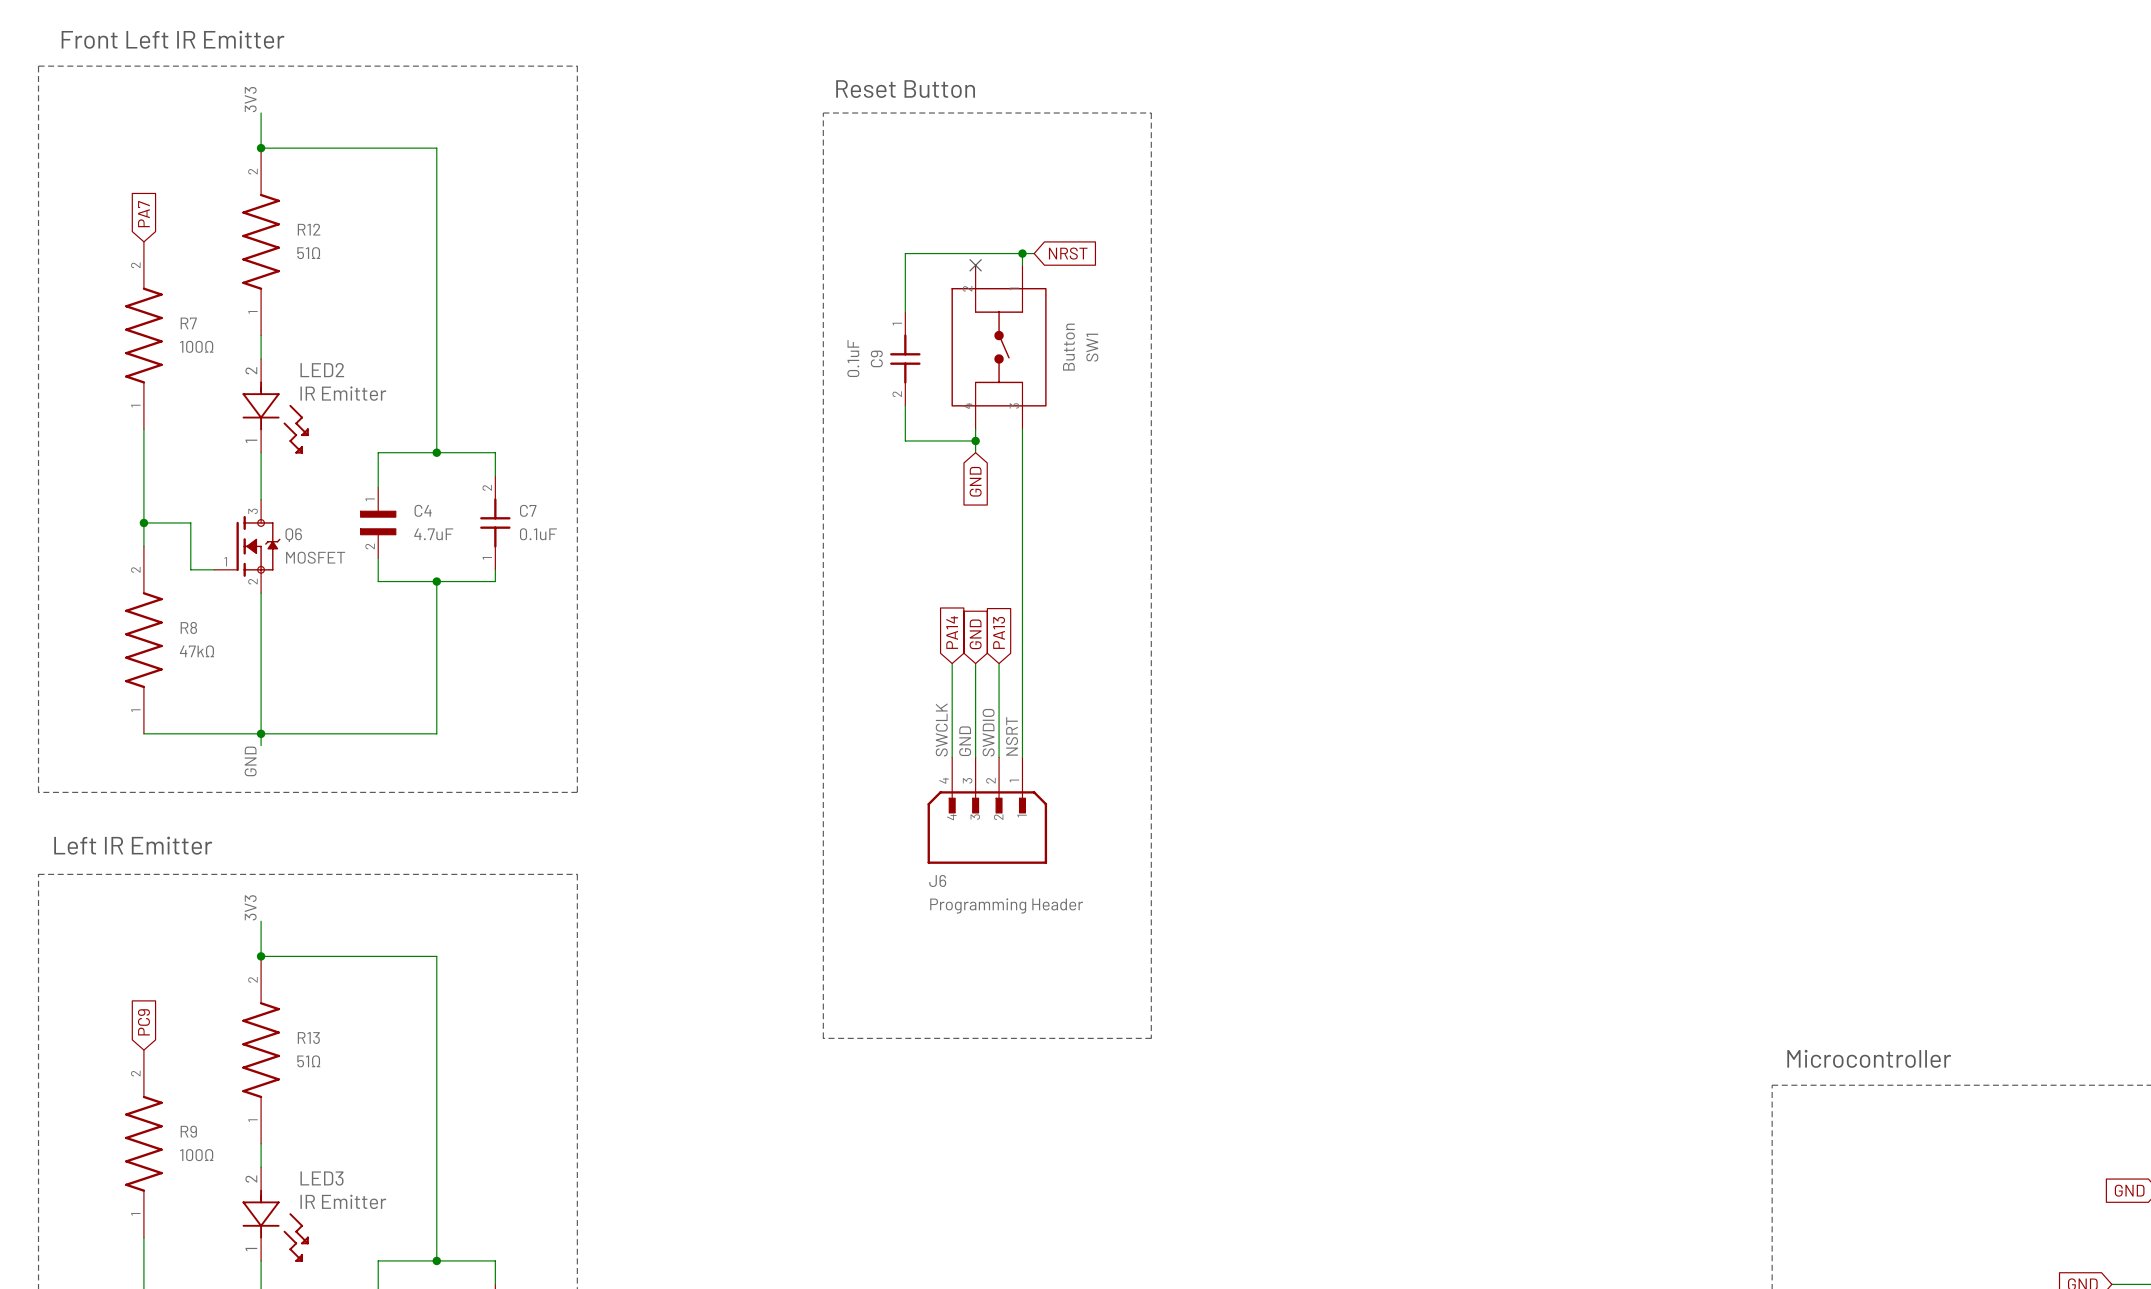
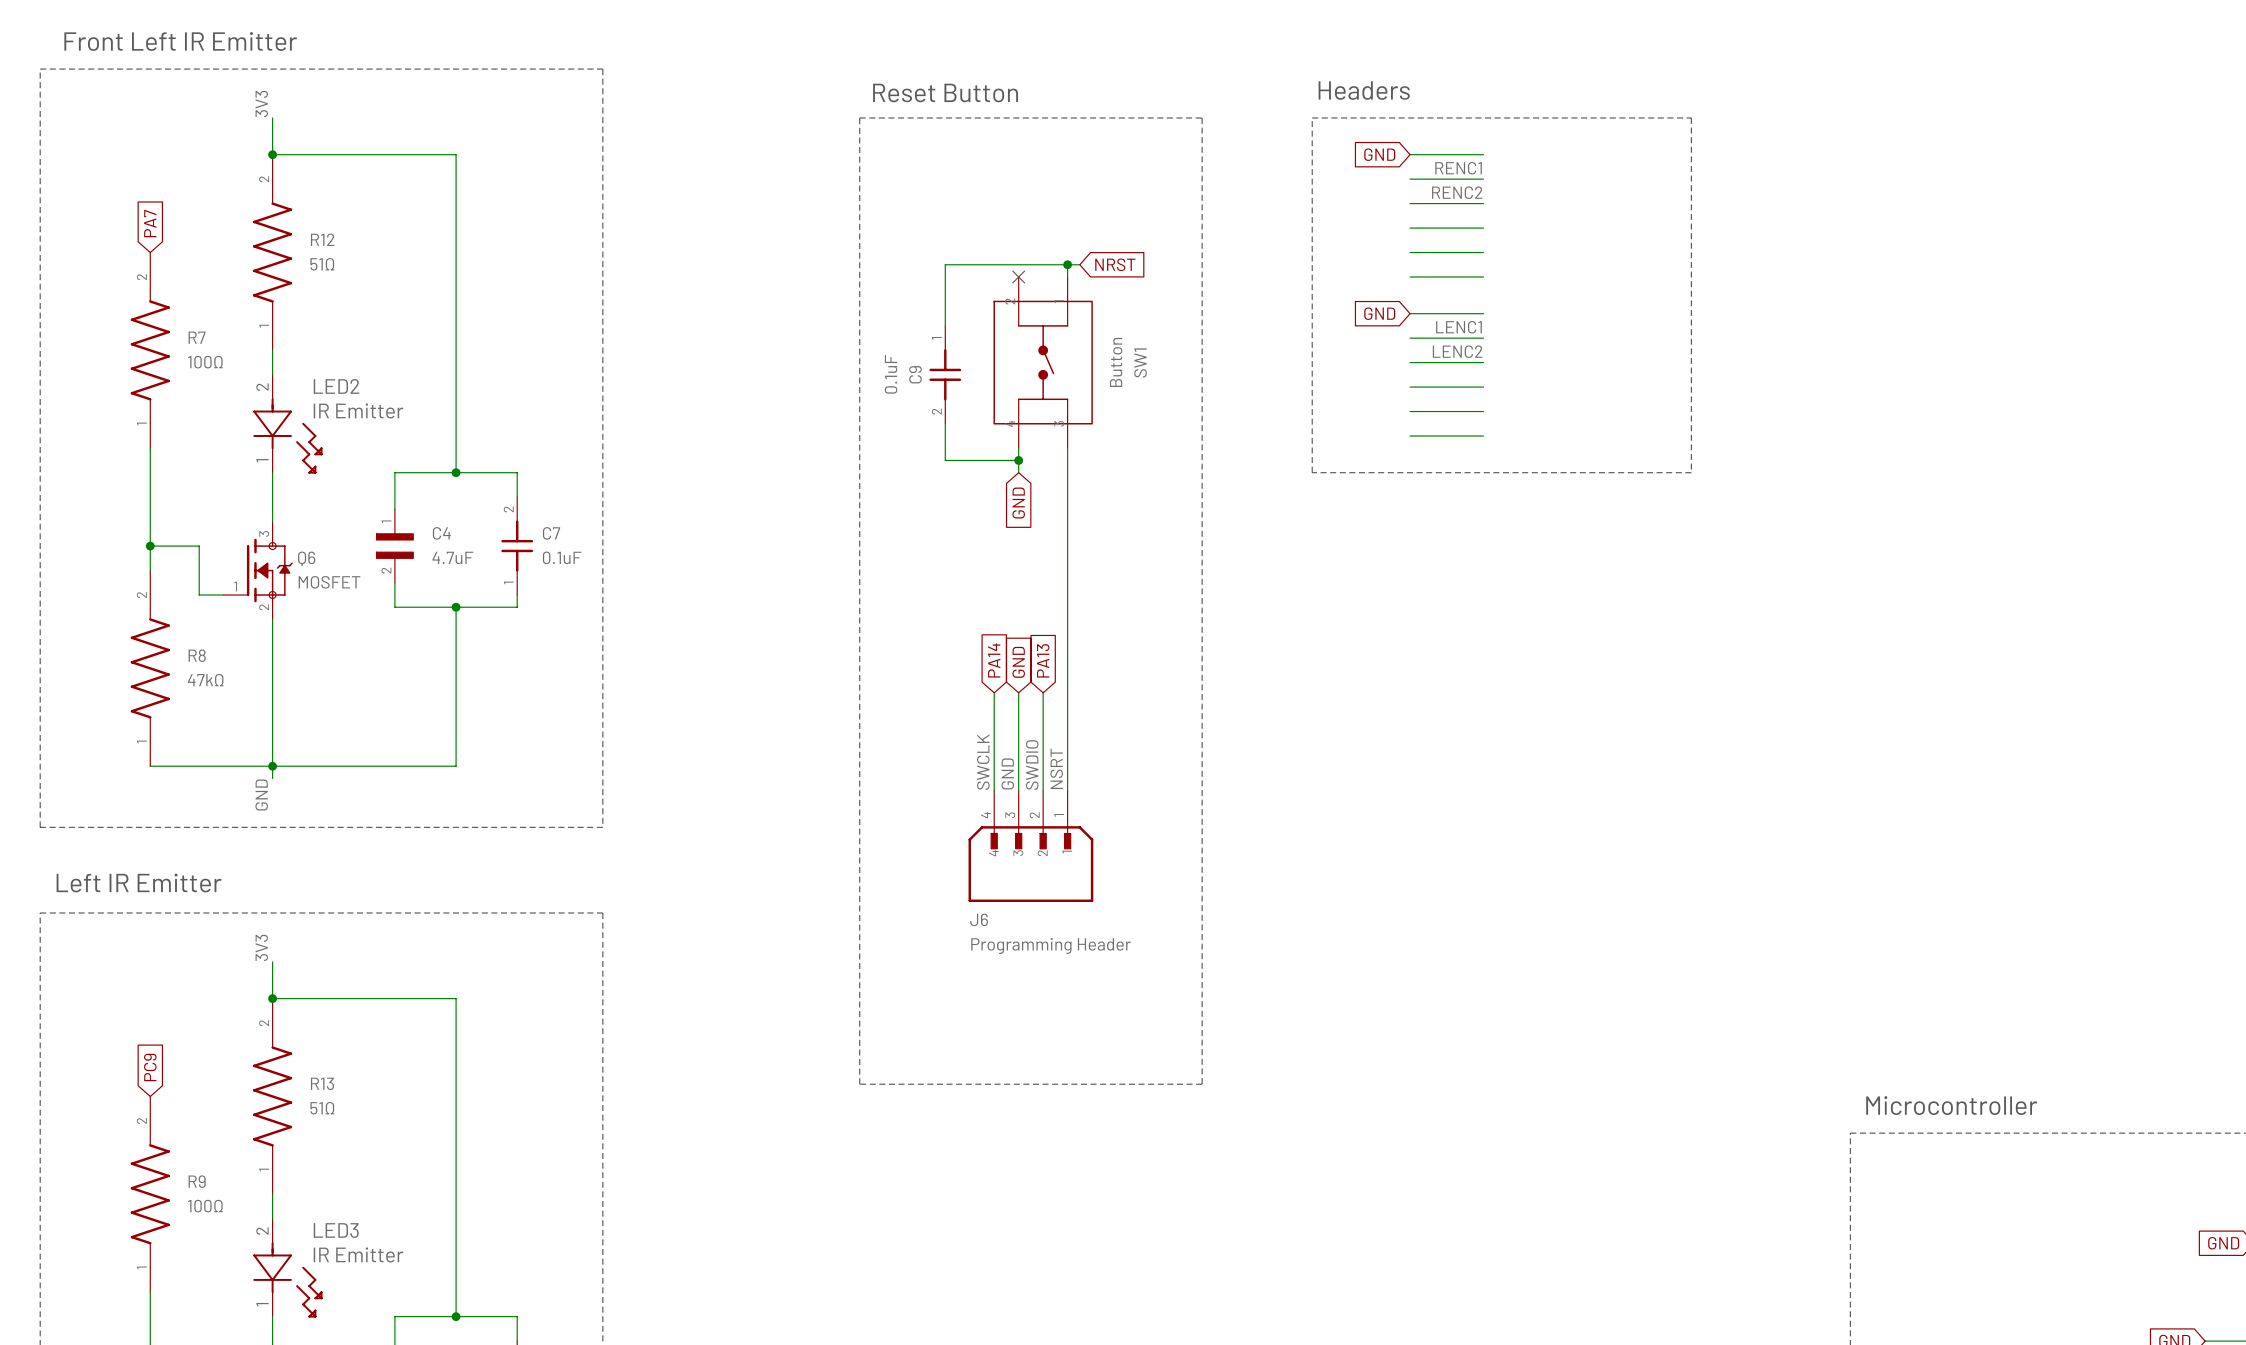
text: none -> Headers (1364, 90)
line: none -> (1312, 117) (1691, 117) (1691, 472) (1312, 472) (1312, 117)
global label: none -> GND (1379, 154)
wire: none -> (1410, 154) (1483, 154)
label: none -> RENC1 (1458, 168)
wire: none -> (1410, 179) (1483, 179)
label: none -> RENC2 (1457, 192)
wire: none -> (1410, 203) (1483, 203)
wire: none -> (1410, 228) (1483, 228)
wire: none -> (1410, 252) (1483, 252)
wire: none -> (1410, 276) (1483, 276)
global label: none -> GND (1379, 313)
wire: none -> (1410, 313) (1483, 313)
label: none -> LENC1 (1458, 327)
wire: none -> (1410, 338) (1483, 338)
label: none -> LENC2 (1457, 351)
wire: none -> (1410, 362) (1483, 362)
wire: none -> (1410, 387) (1483, 387)
wire: none -> (1410, 411) (1483, 411)
wire: none -> (1410, 435) (1483, 435)

